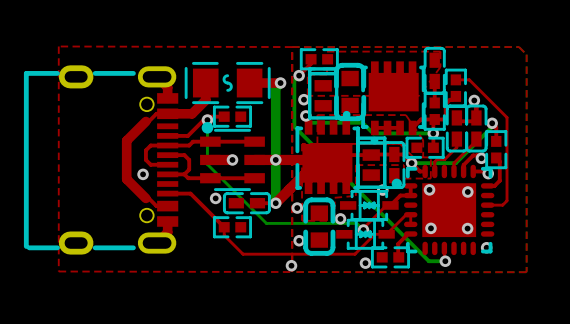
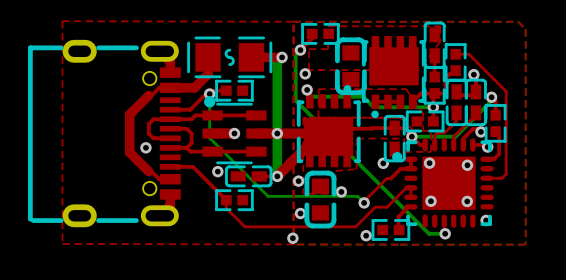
part: (323, 93) -> none
part: (371, 162) -> none
part: (369, 205) -> none
part: (365, 234) -> none

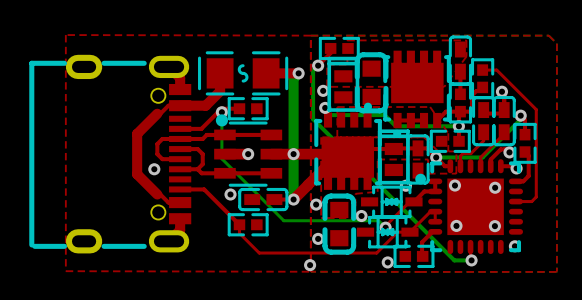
part: none -> (343, 84)
part: none -> (393, 156)
part: none -> (391, 201)
part: none -> (387, 232)

